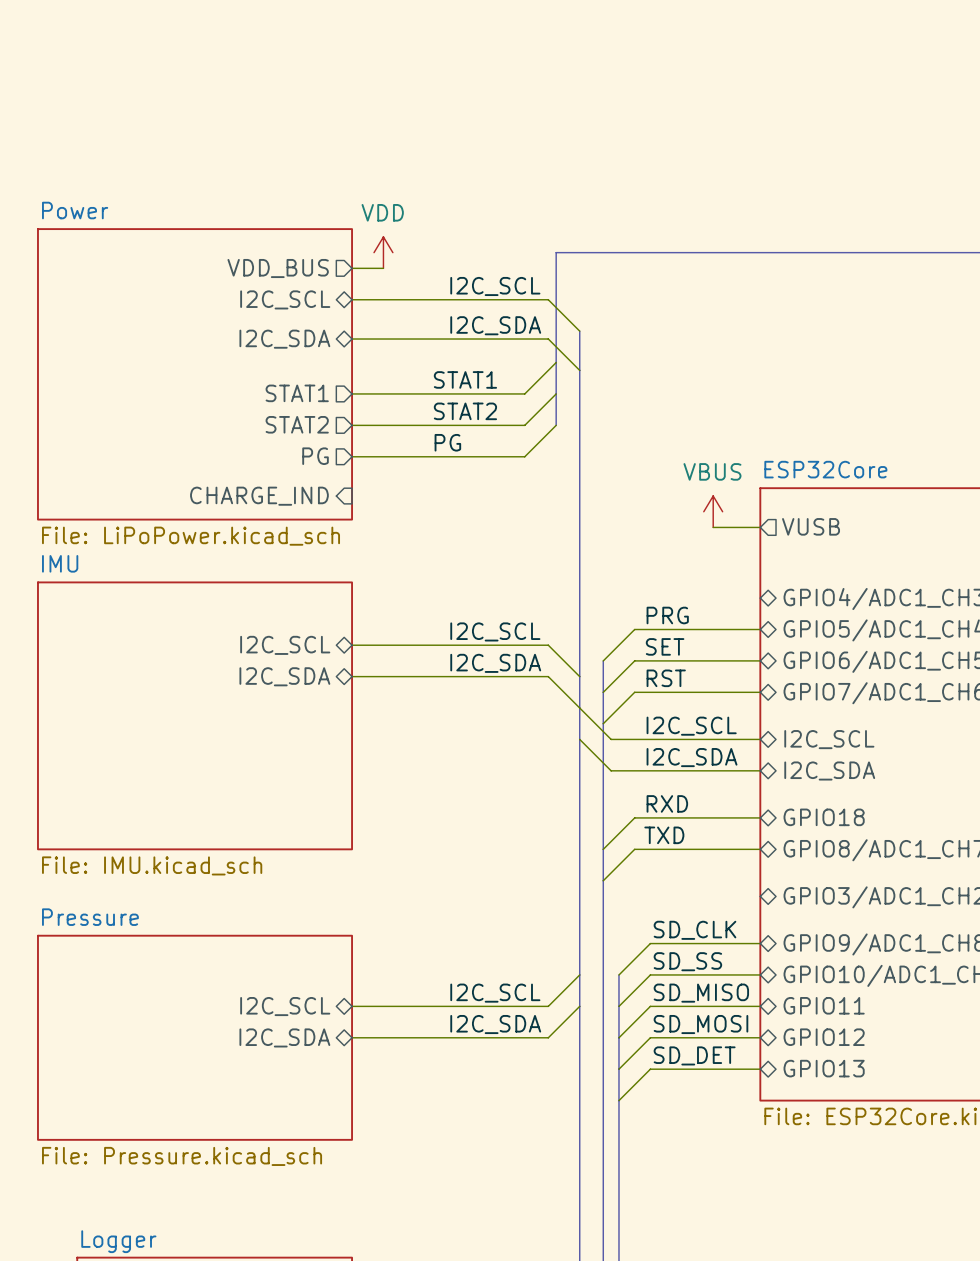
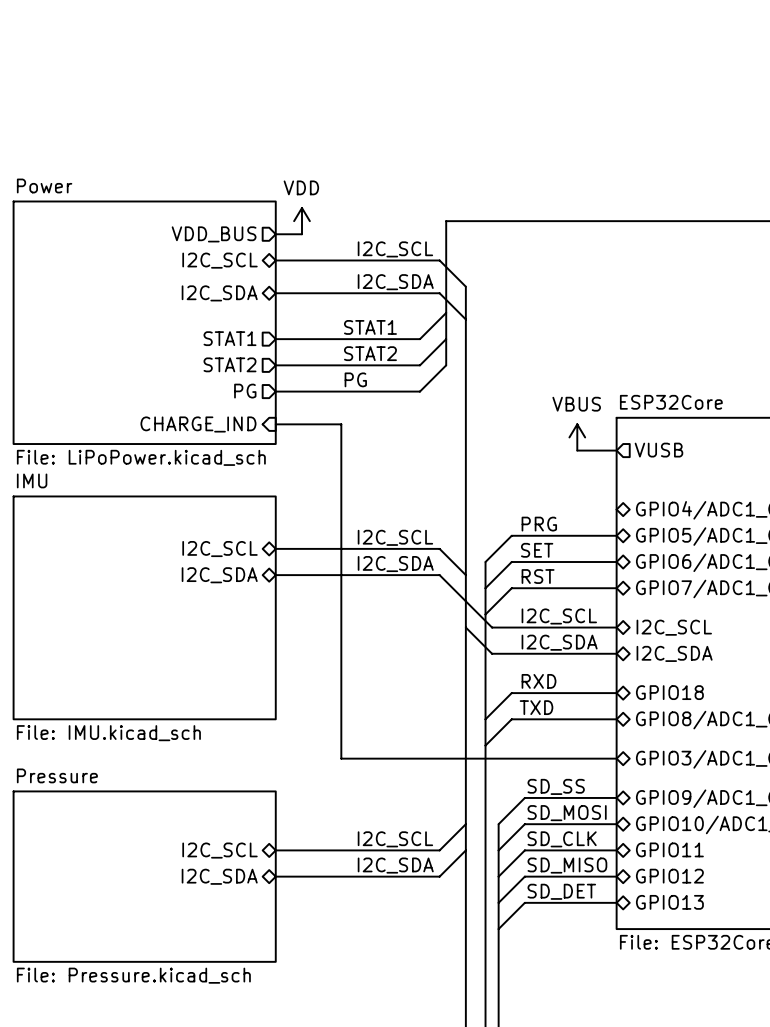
wire: none -> (275, 424) (341, 424) (341, 758) (616, 758)
label: SD_CLK (695, 930) -> SD_SS (556, 786)
label: SD_SS (687, 961) -> SD_MOSI (567, 813)
label: SD_MISO (701, 993) -> SD_CLK (562, 839)
label: SD_MOSI (700, 1024) -> SD_MISO (567, 865)

